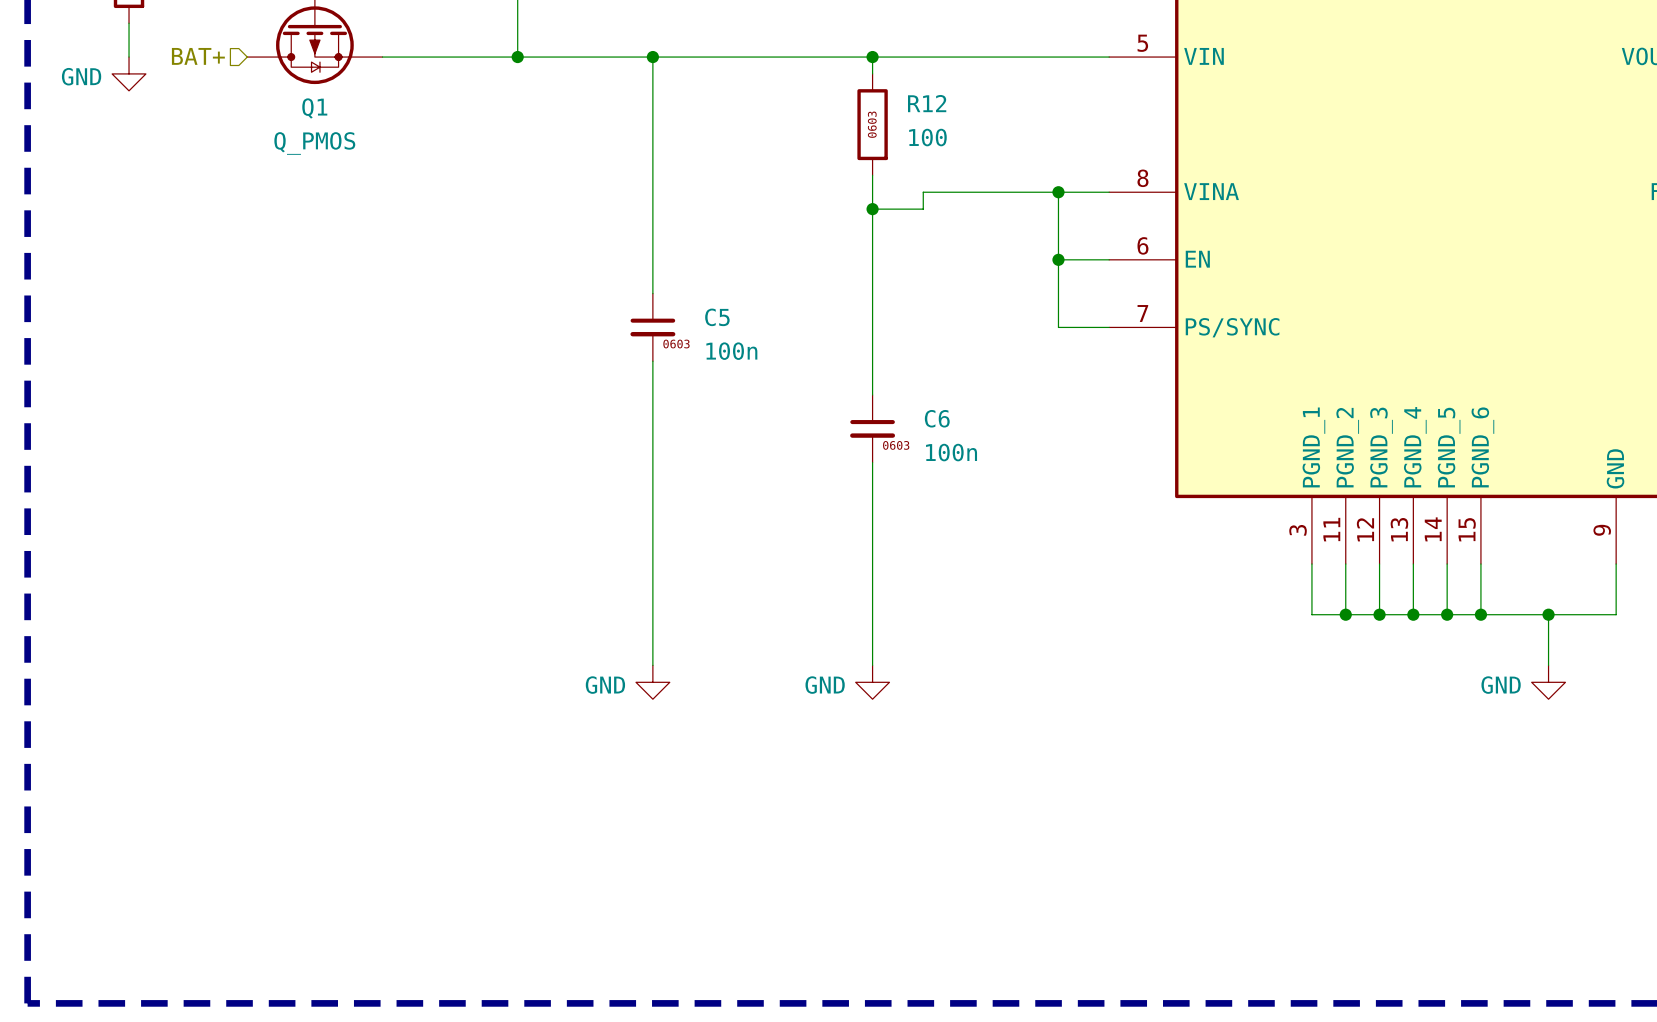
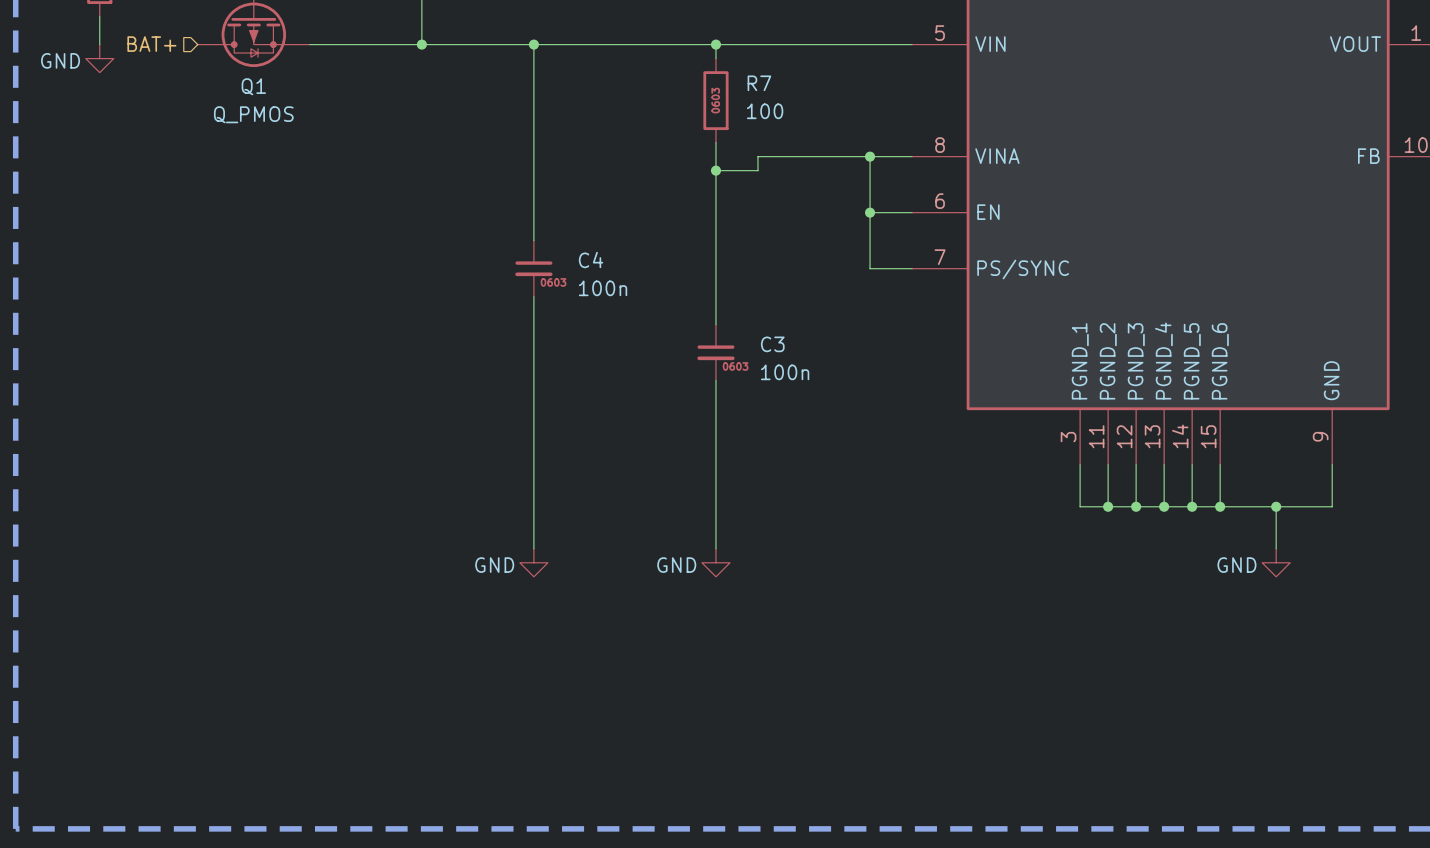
R12 name: R12 (927, 103) -> R7 (759, 83)
C5 name: C5 (717, 317) -> C4 (591, 260)
C6 name: C6 (937, 418) -> C3 (772, 344)

